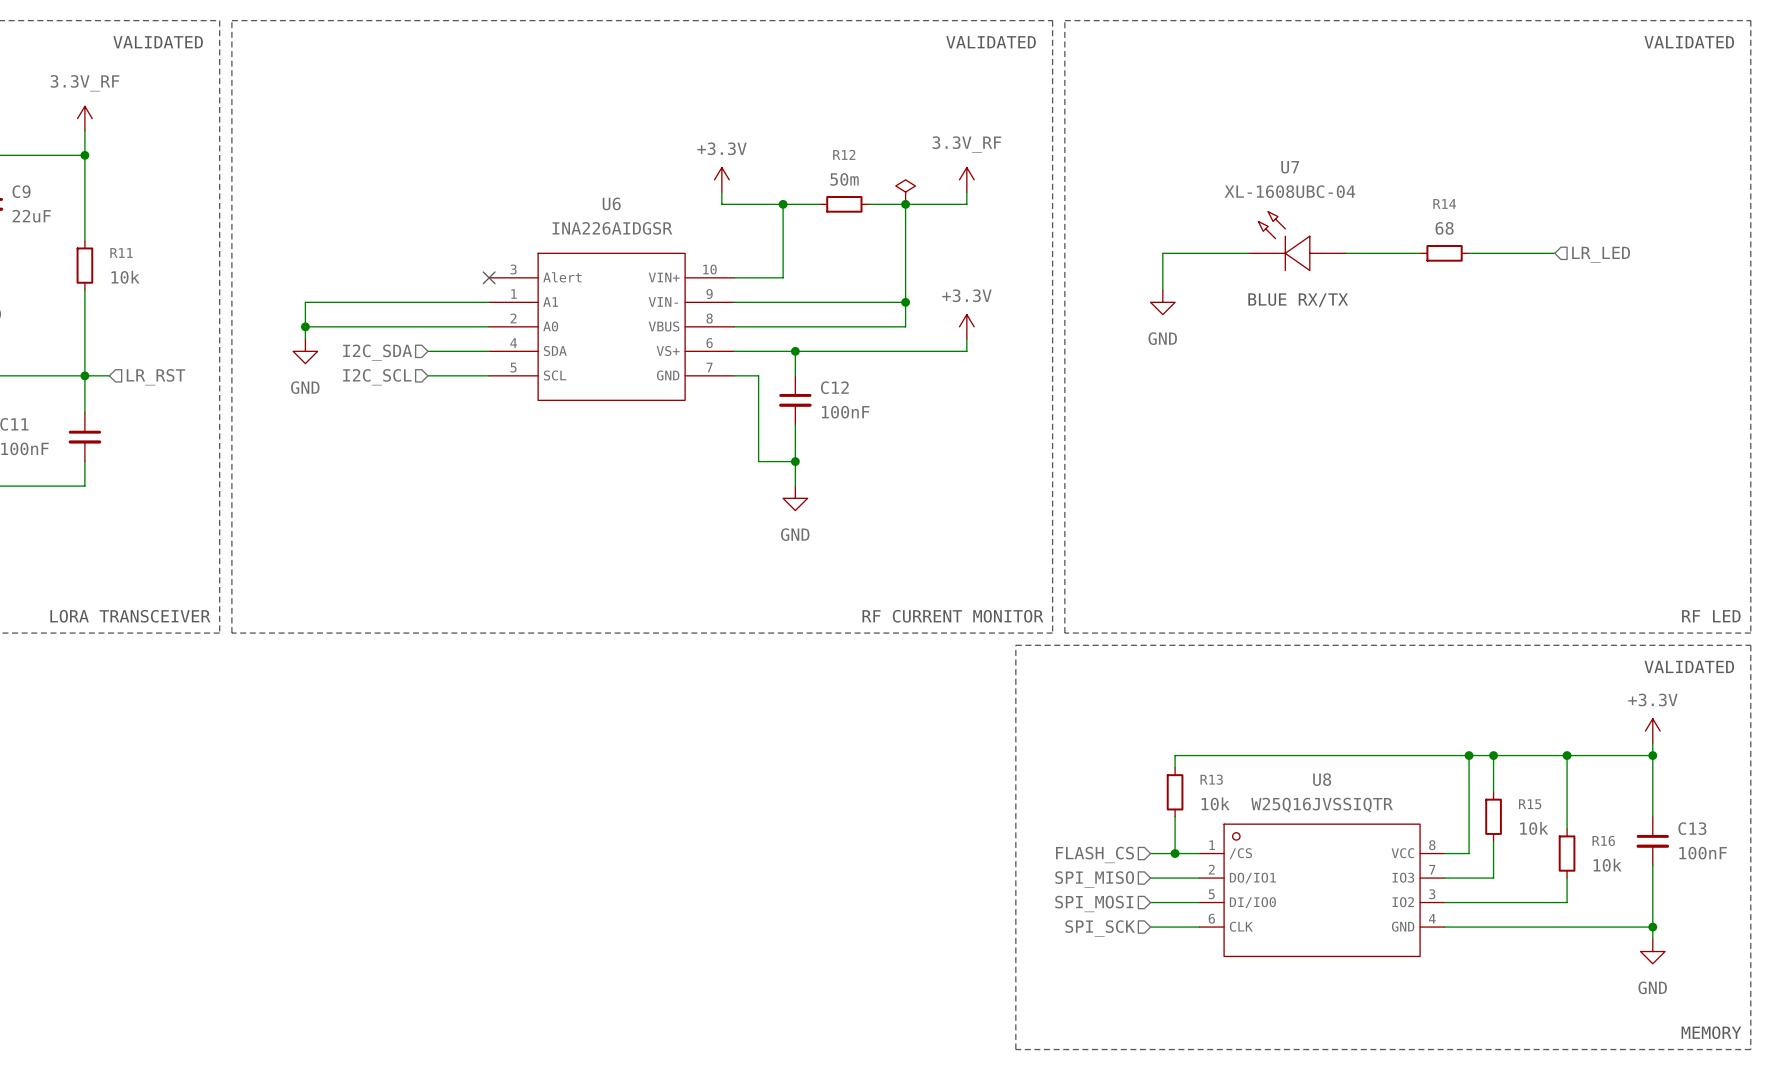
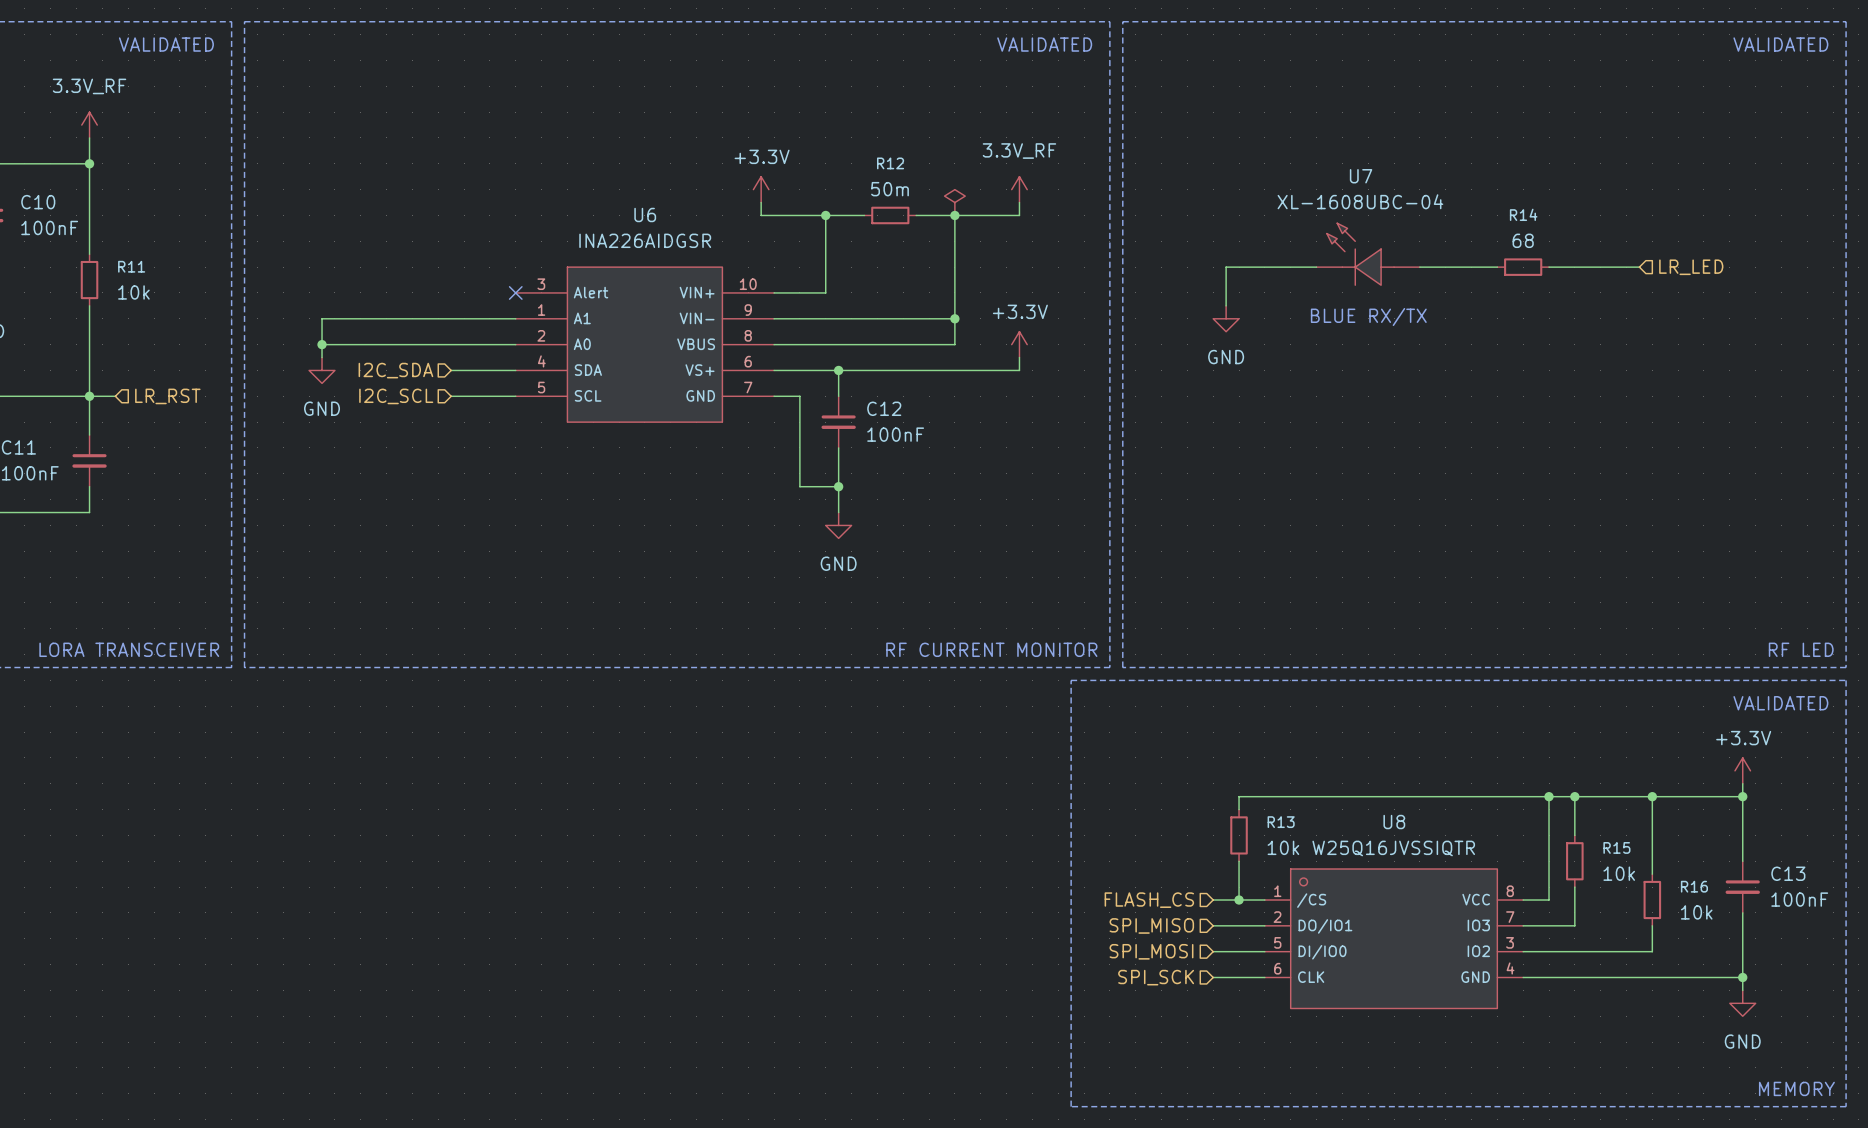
C9 name: C9 (21, 191) -> C10 (38, 202)
C9 value: 22uF (31, 216) -> 100nF (49, 227)

